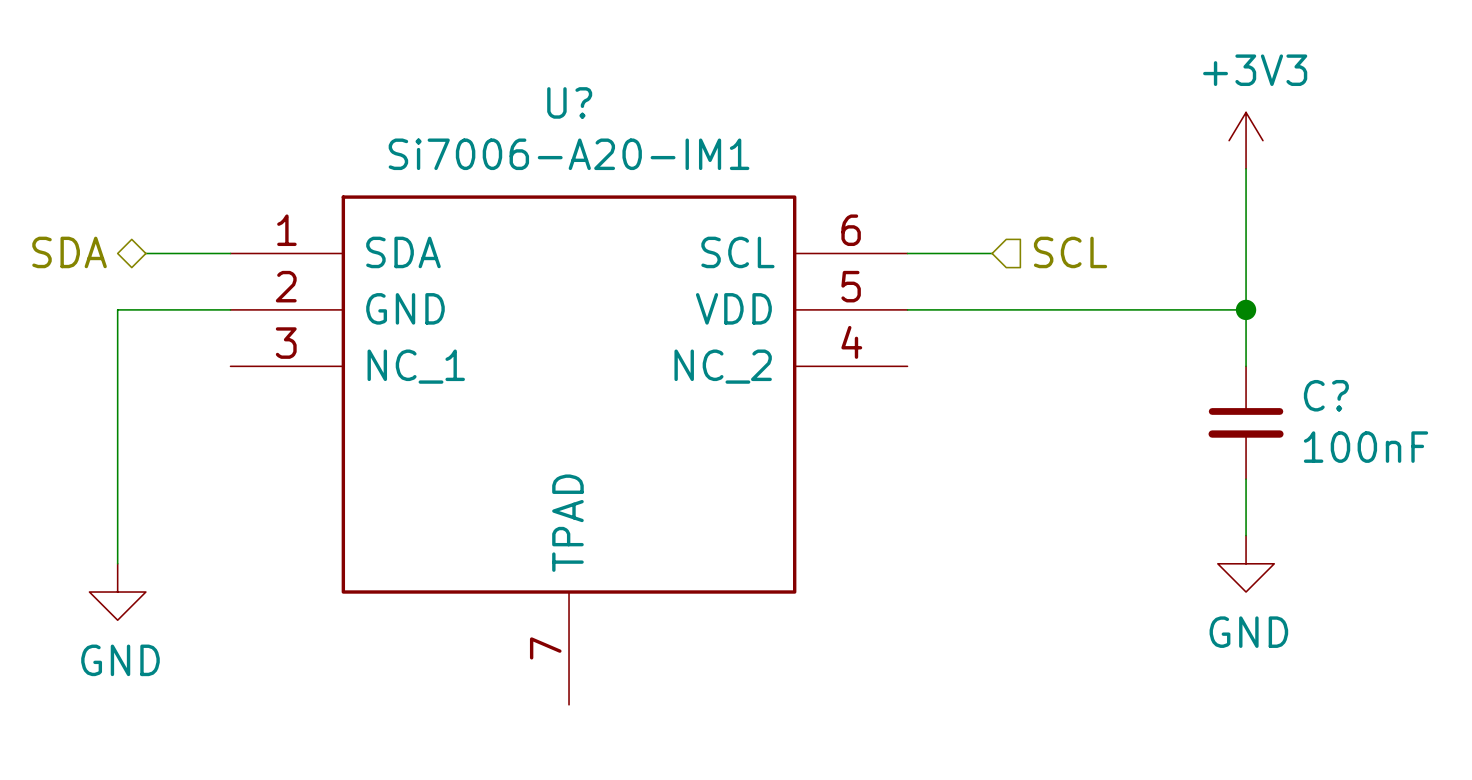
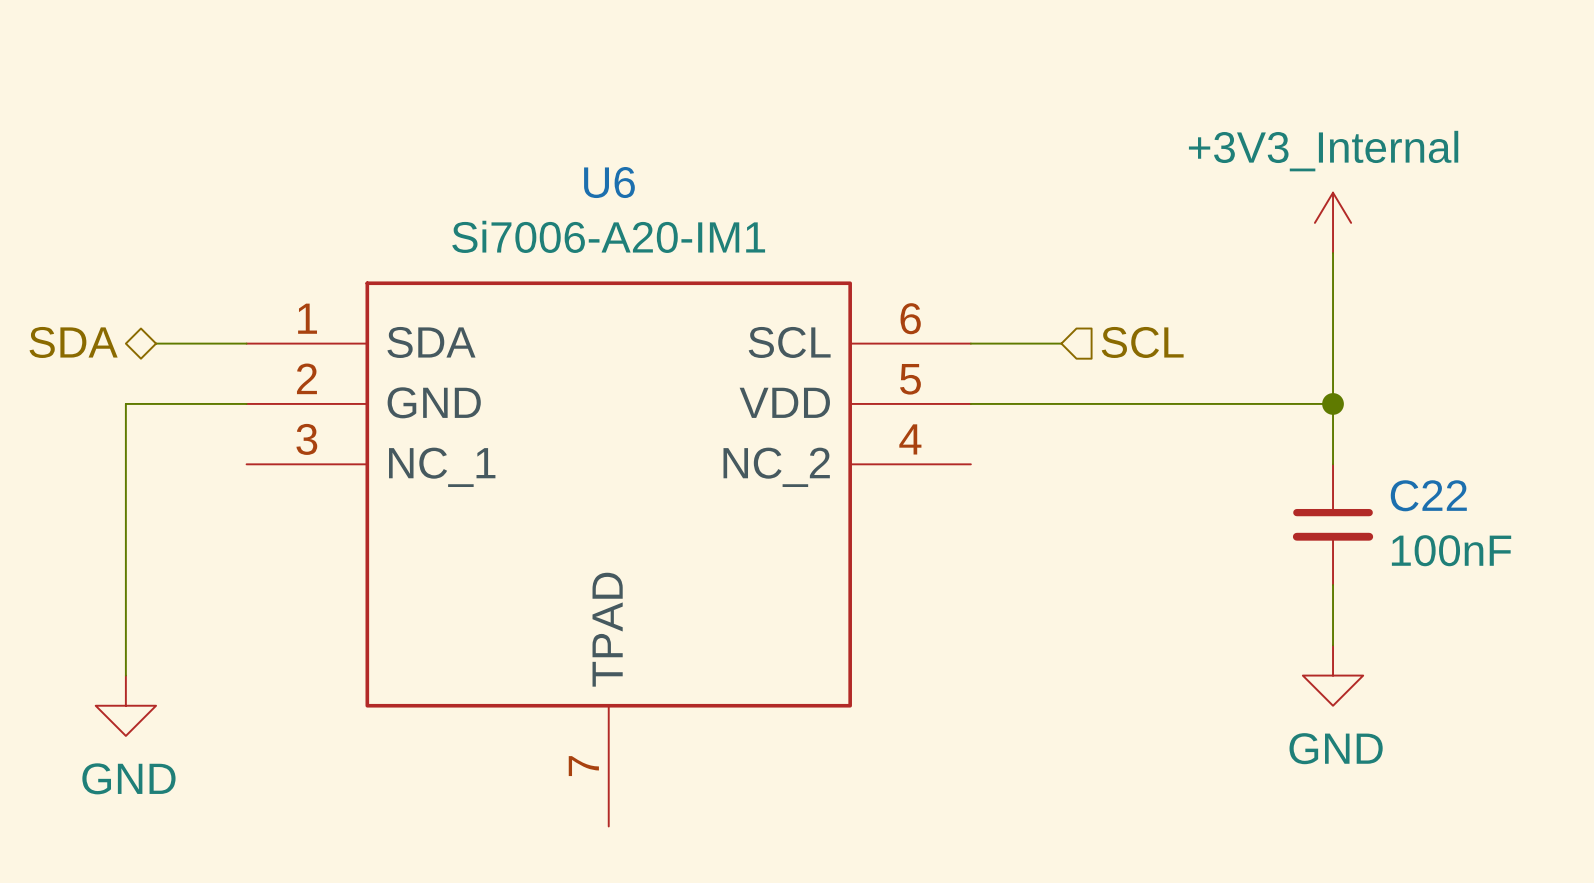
U? name: U? (569, 102) -> U6 (609, 182)
power symbol: +3V3 (1246, 140) -> +3V3_Internal (1333, 222)
C? name: C? (1326, 395) -> C22 (1428, 495)

